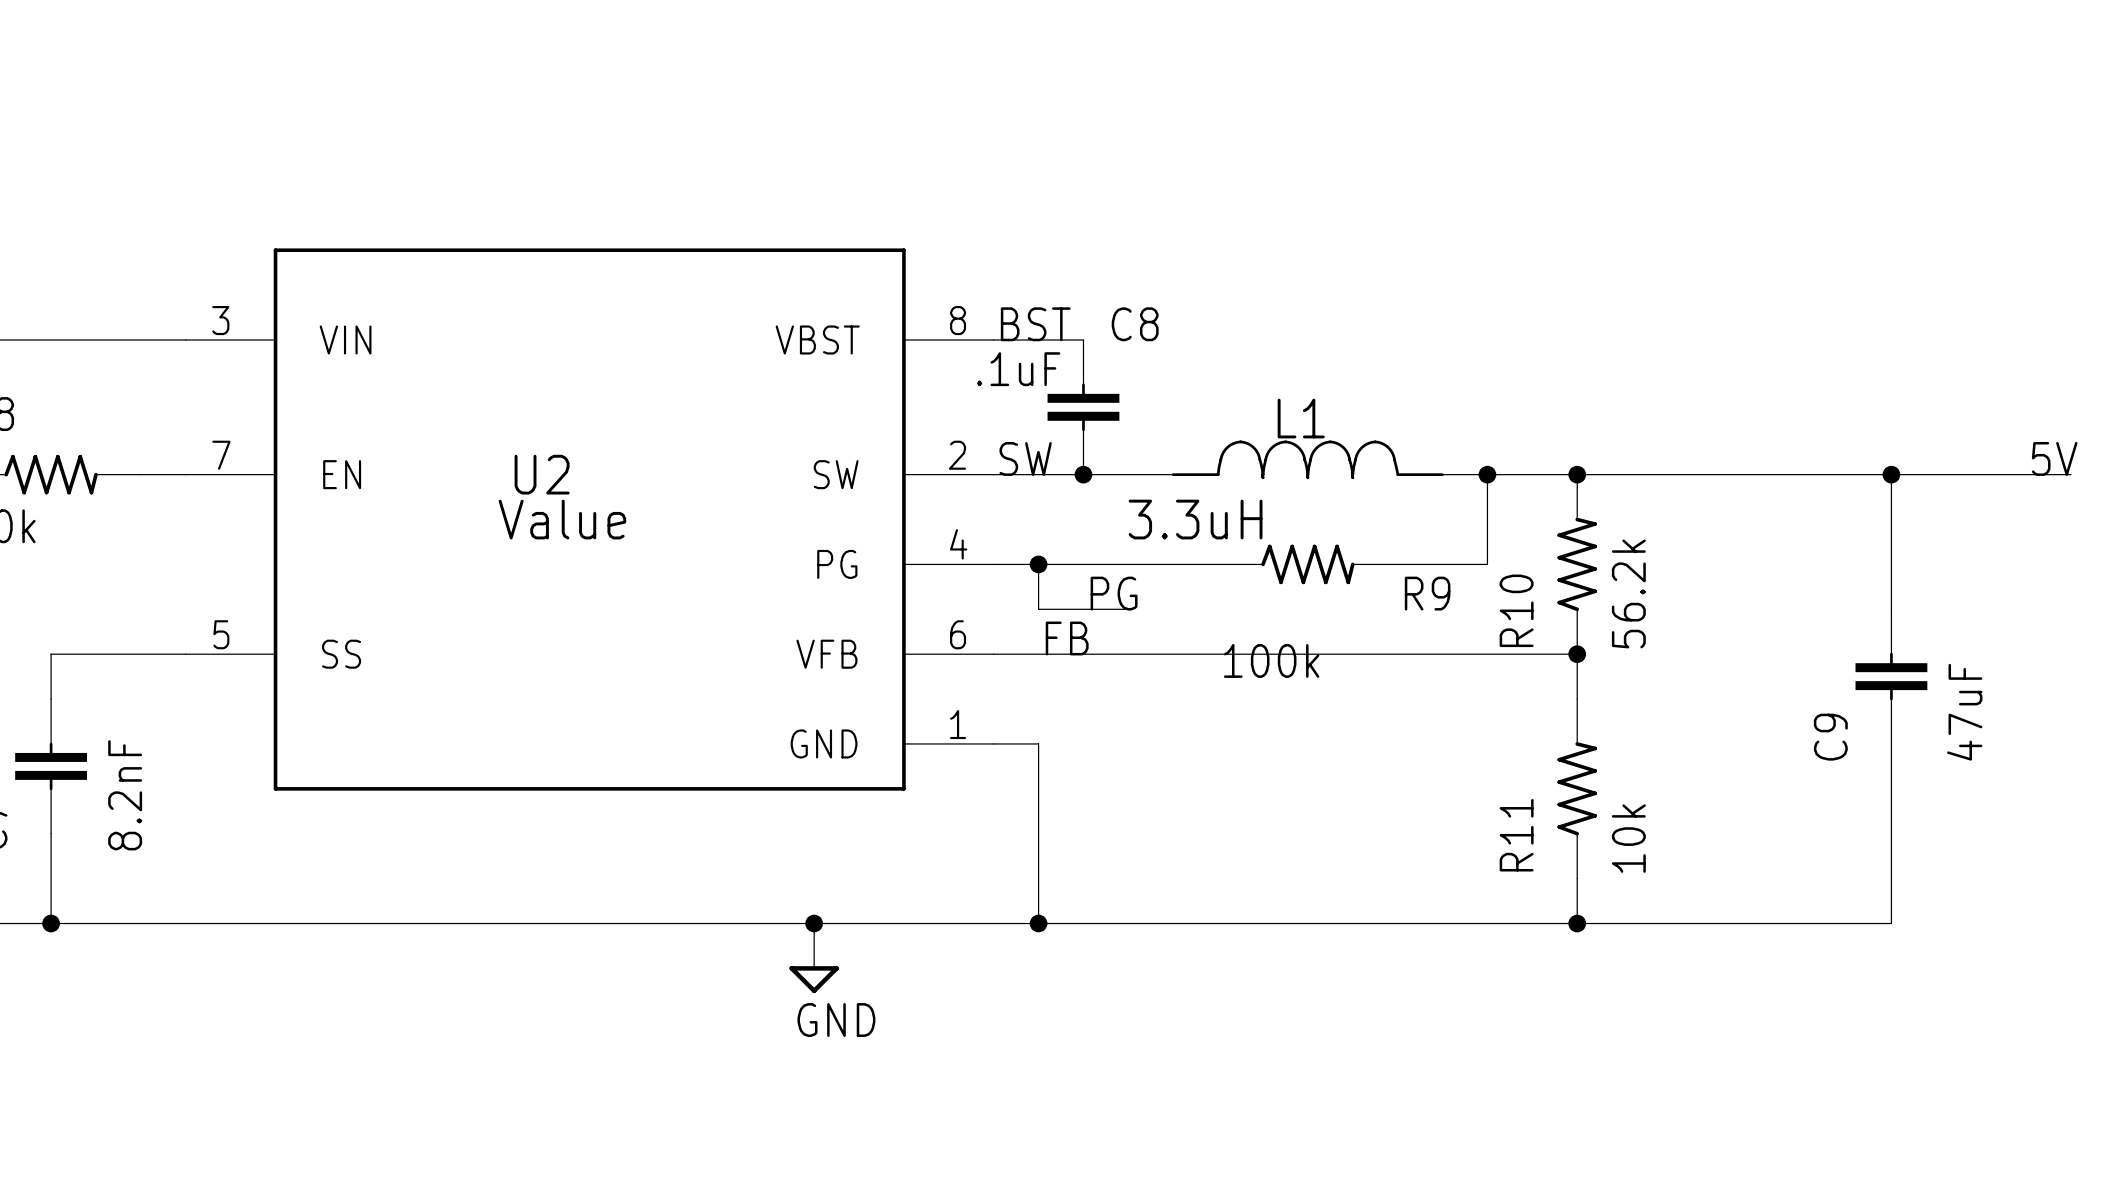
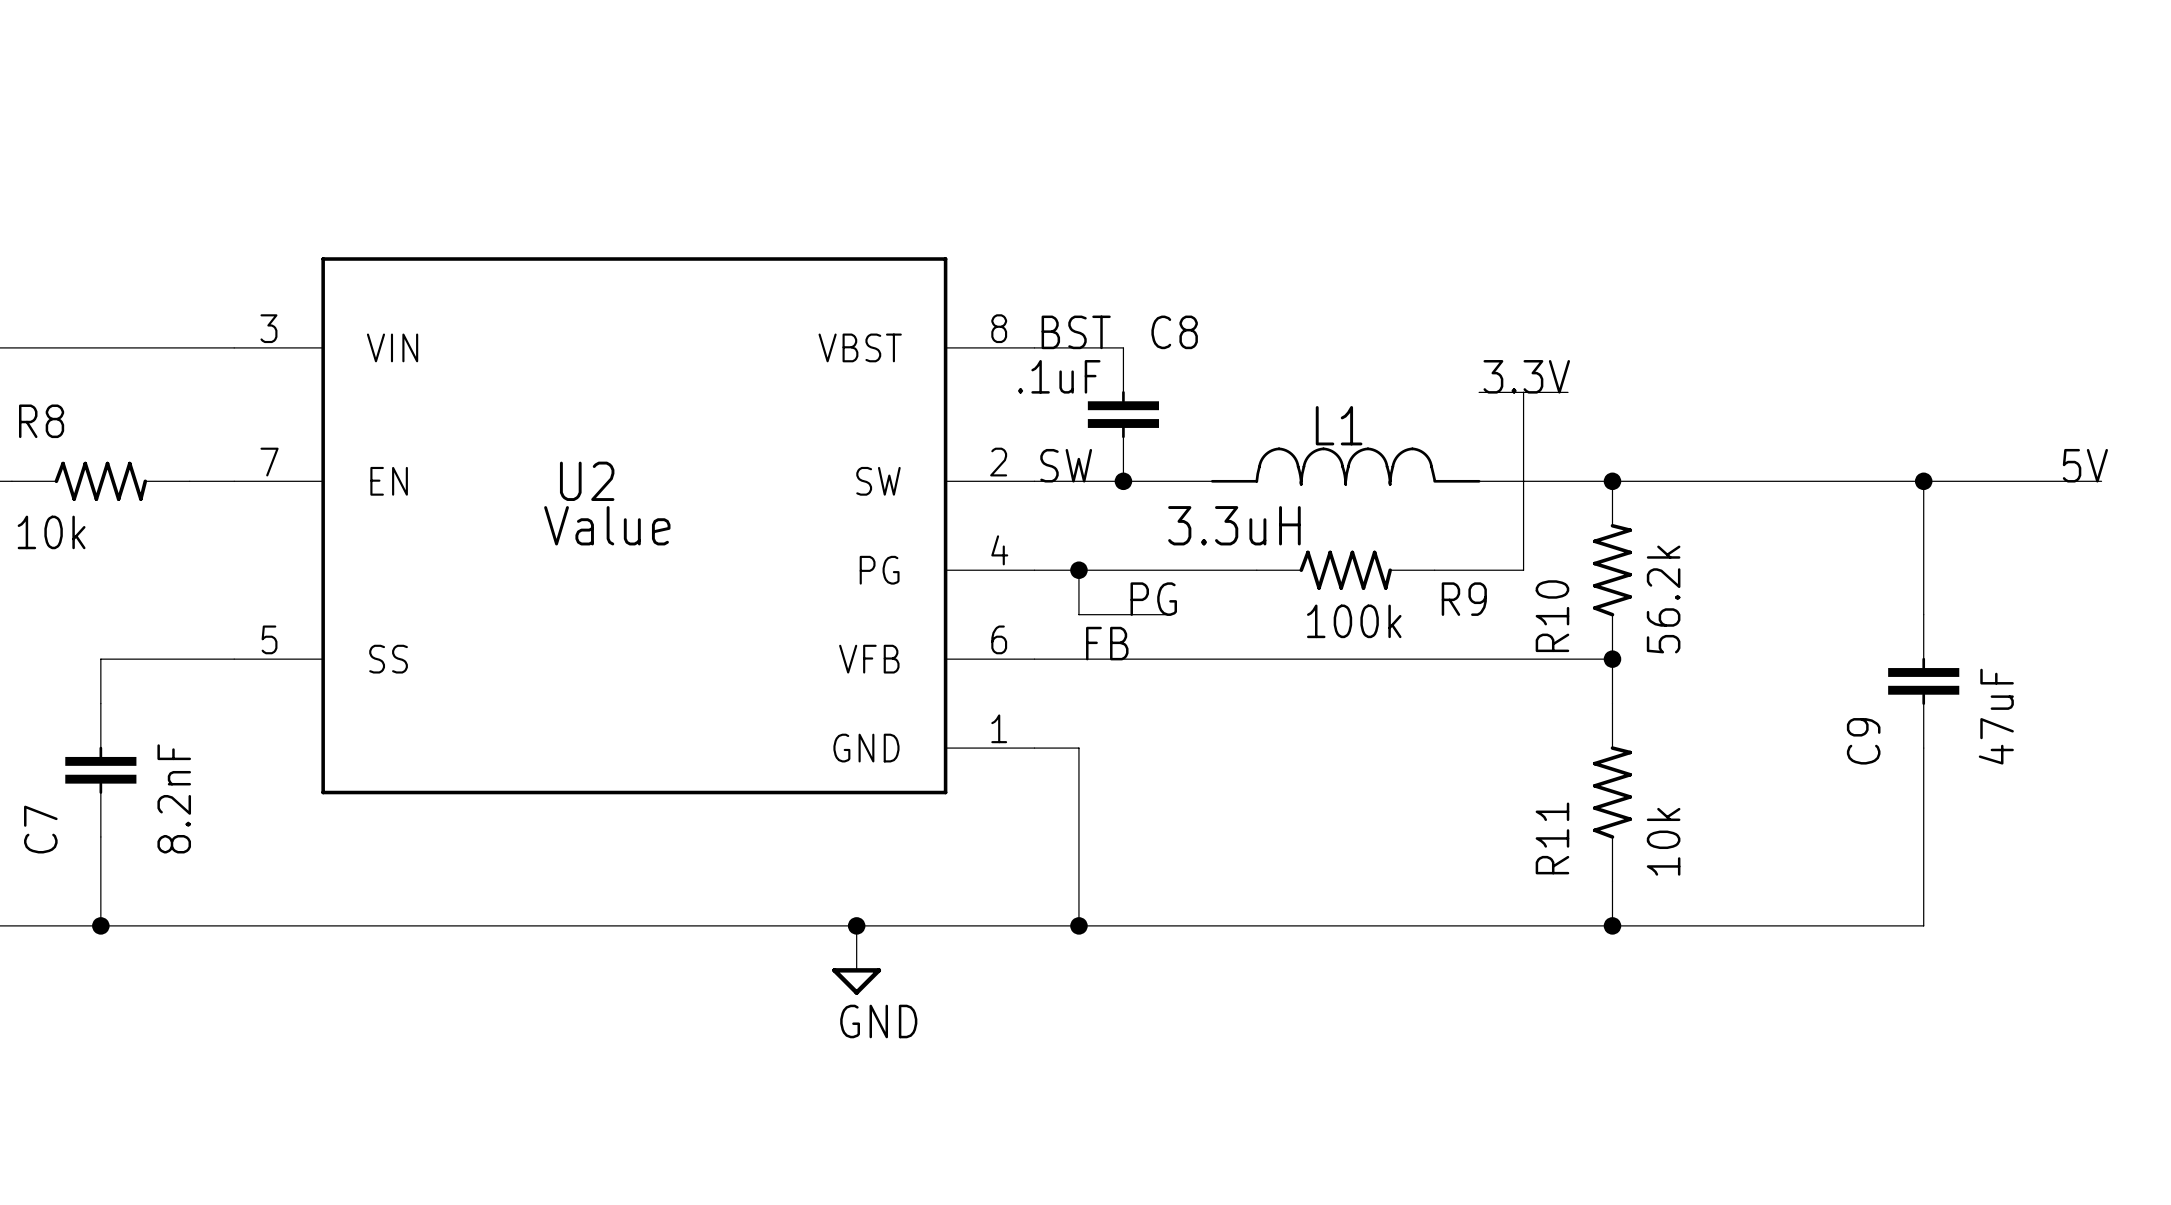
label: none -> 3.3V (1526, 376)
wire: none -> (1479, 392) (1568, 392)
wire: none -> (1523, 392) (1523, 481)
junction: (1487, 474) -> none
R9 value position: 100k (1271, 660) -> 100k (1354, 621)

